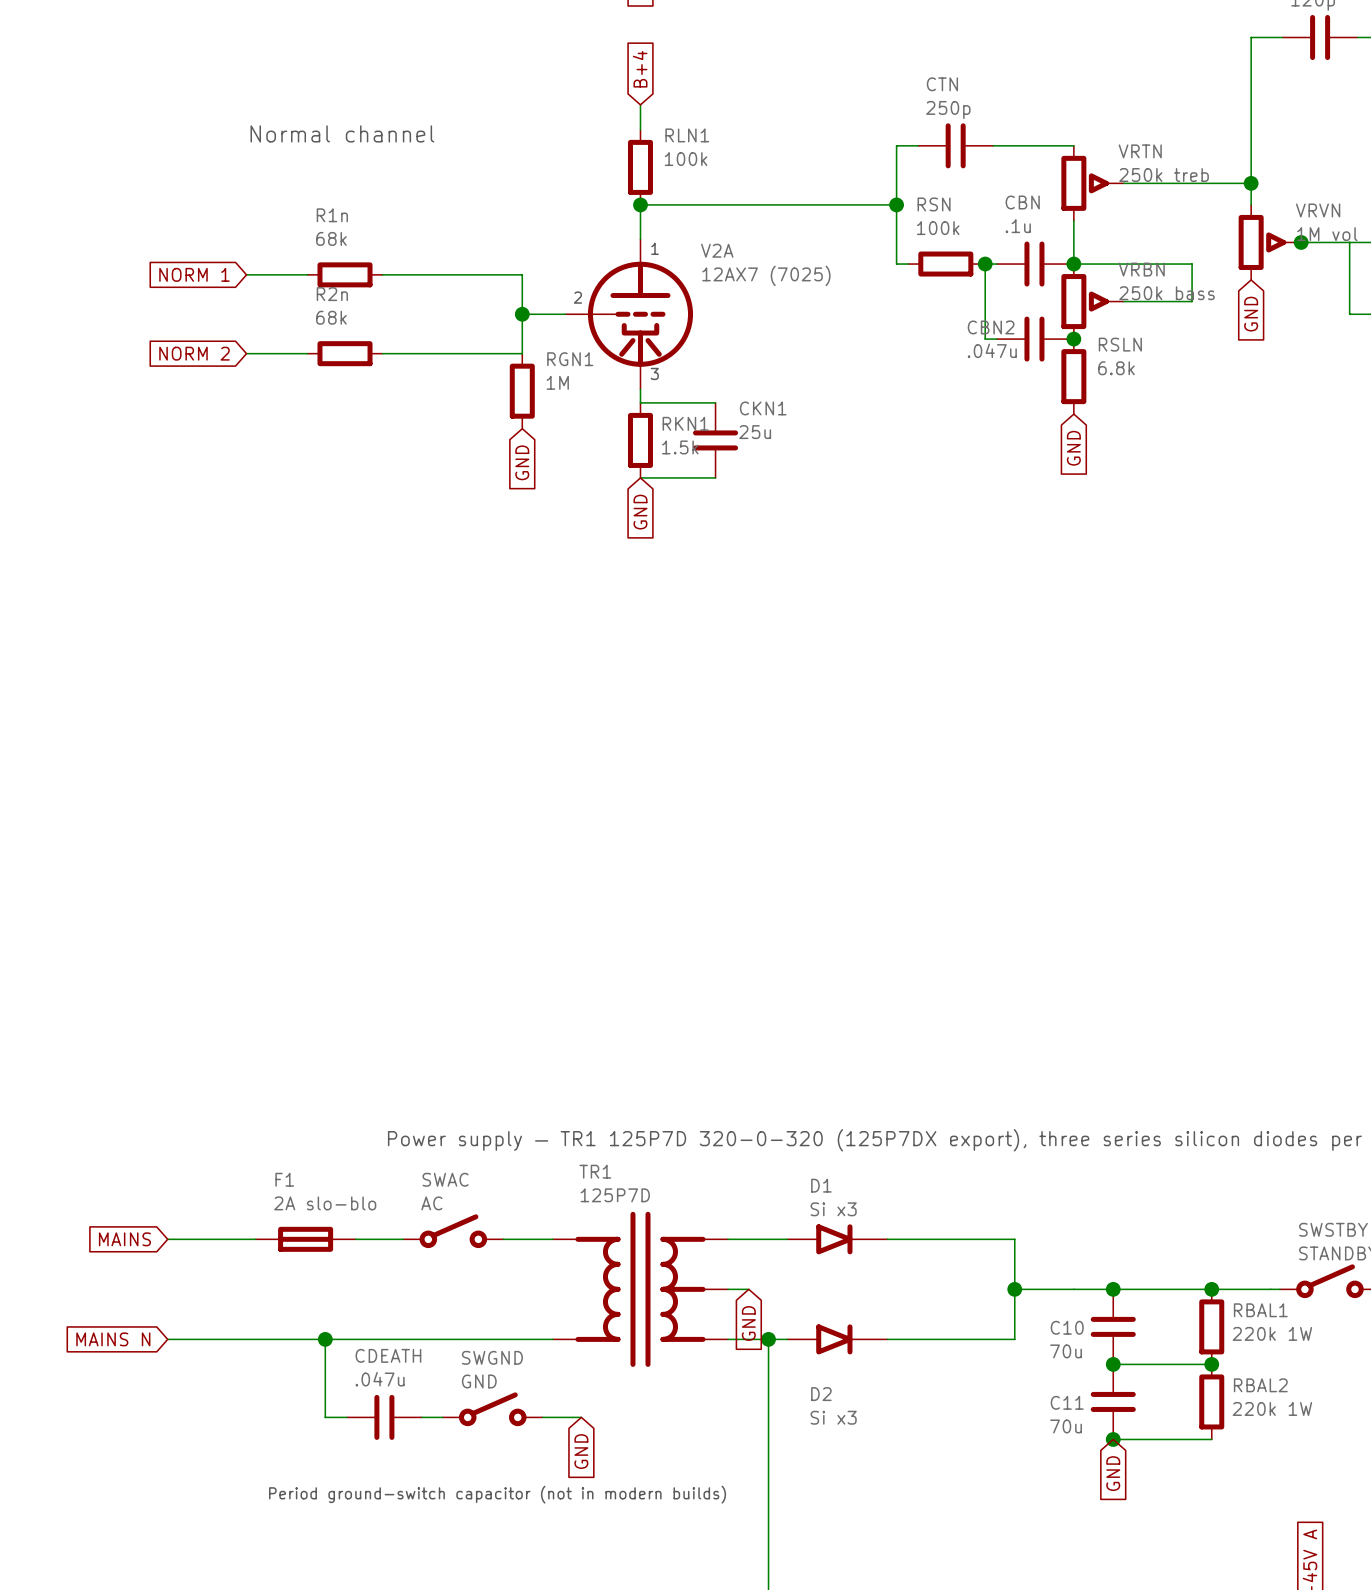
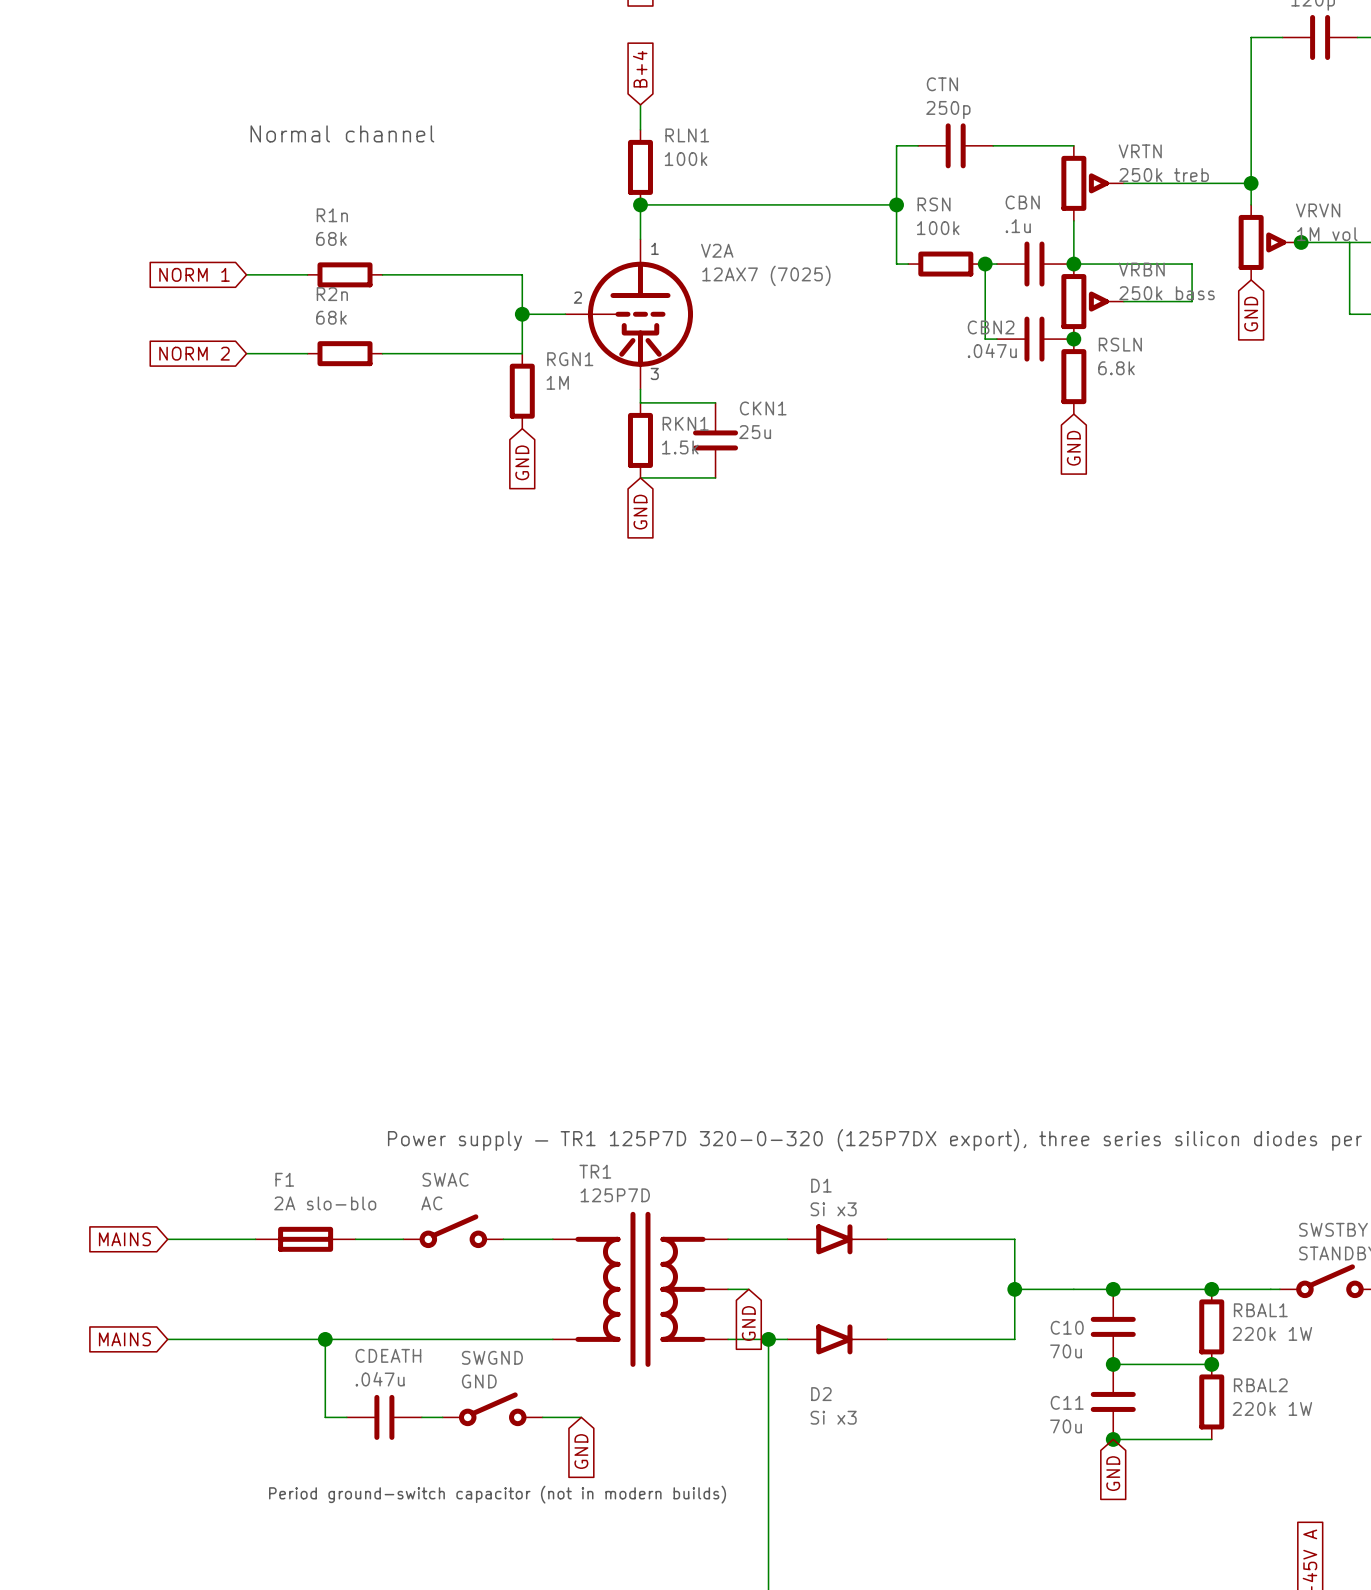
global label: MAINS N (113, 1339) -> MAINS (124, 1339)

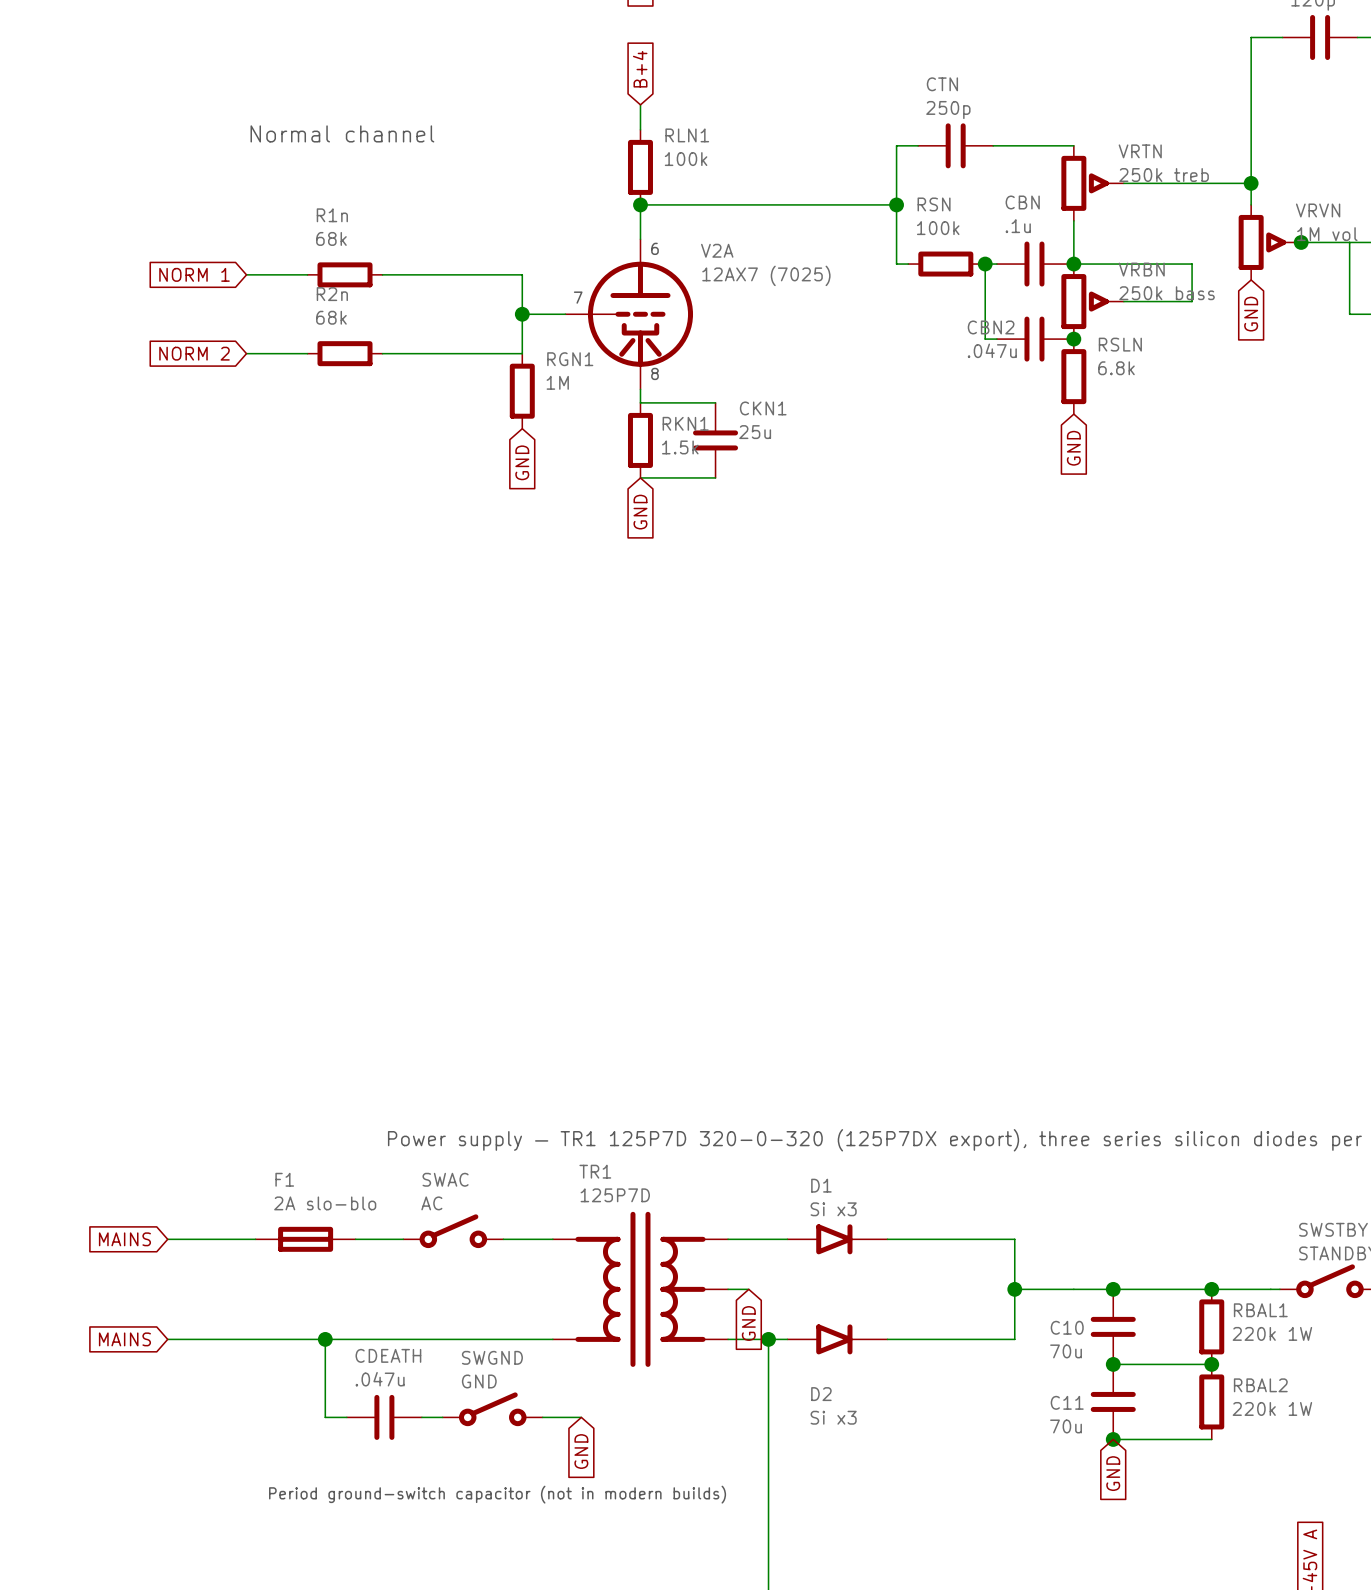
text: 1 (655, 248) -> 6 (655, 248)
text: 2 (577, 297) -> 7 (578, 297)
text: 3 (654, 373) -> 8 (655, 373)

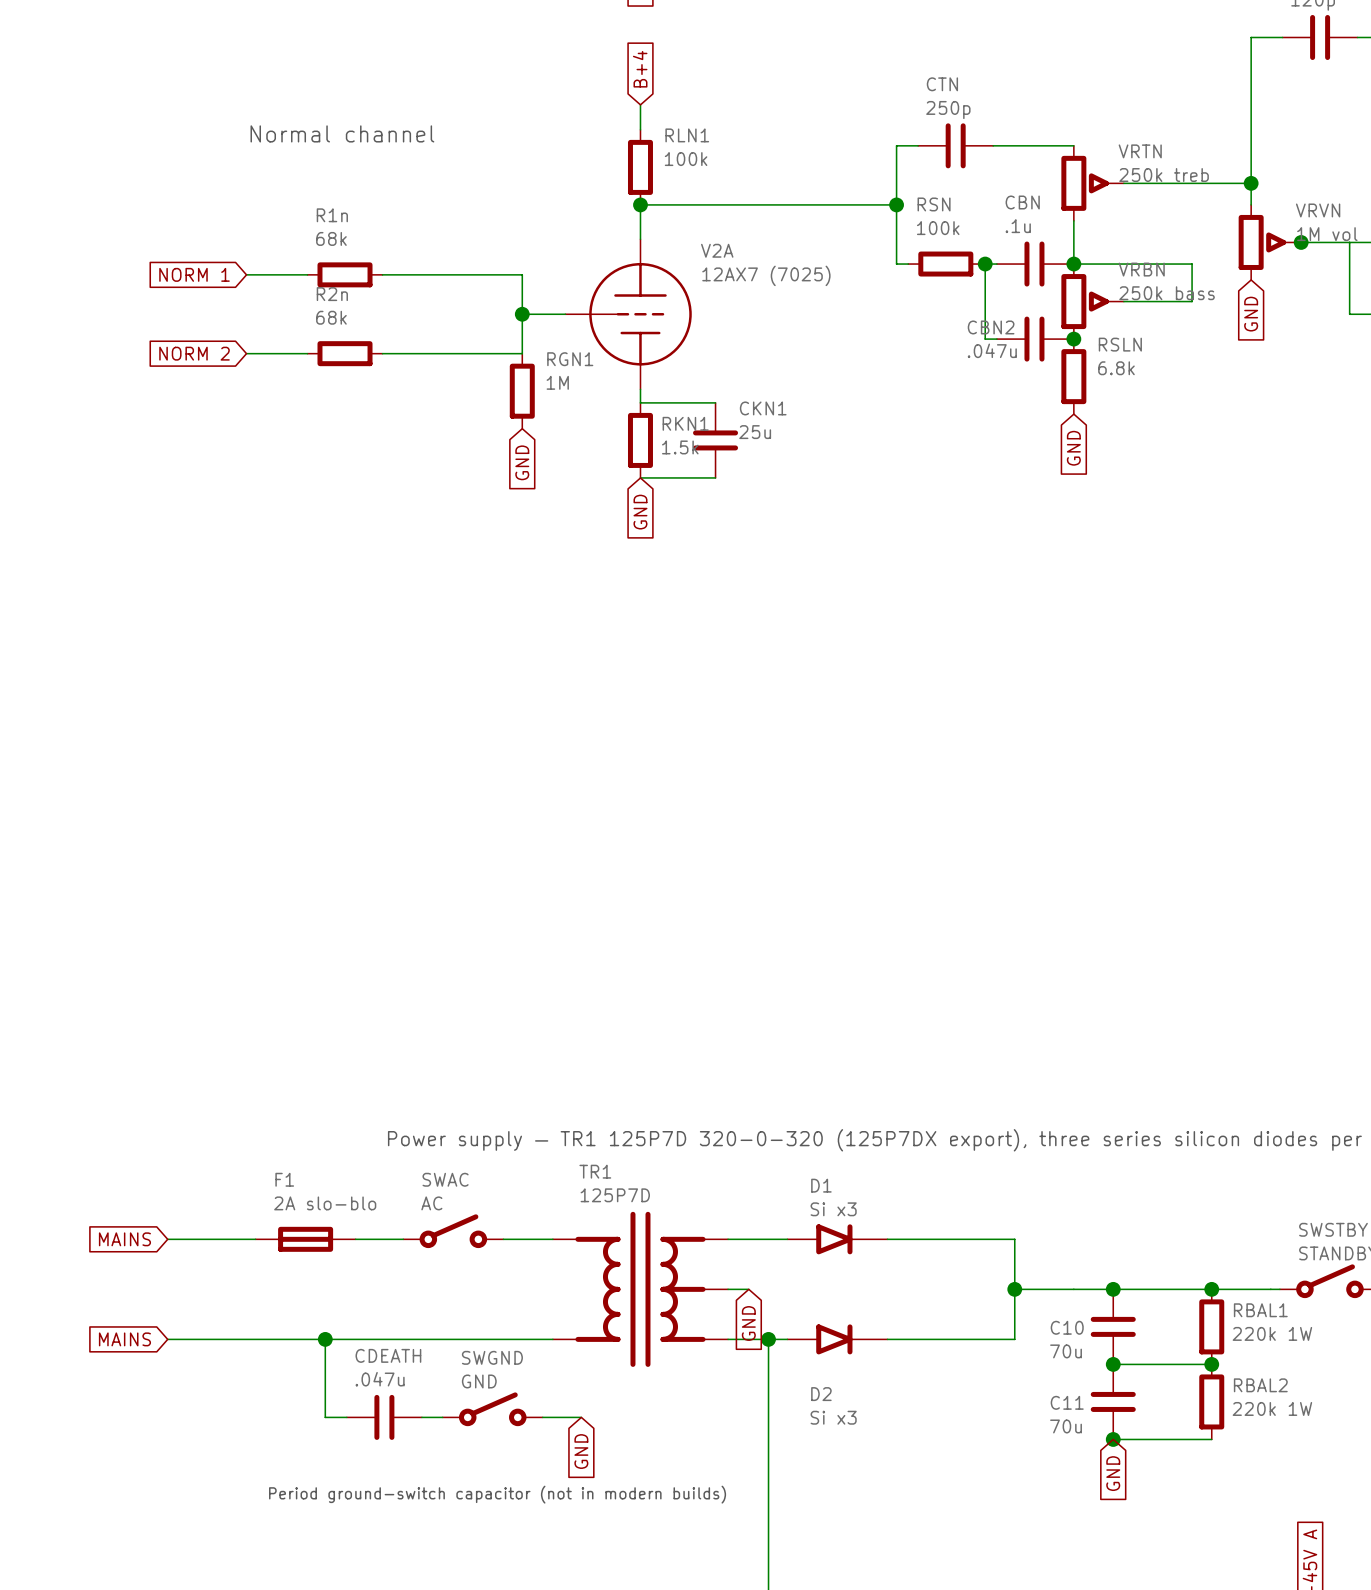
V2A symbol: [565, 239, 694, 390] -> [565, 239, 692, 390]
text: 6 (655, 248) -> none
text: 7 (578, 297) -> none
text: 8 (655, 373) -> none

